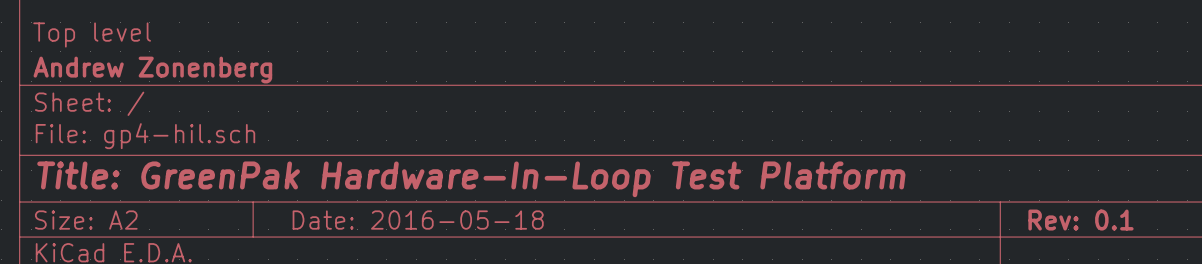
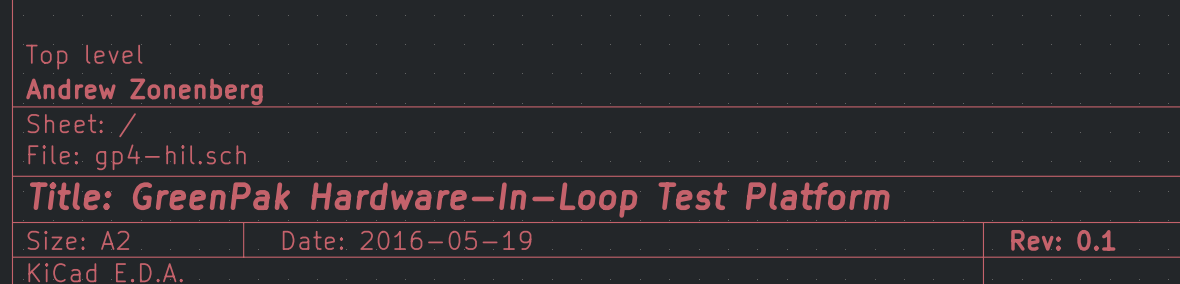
title block: Date: 2016-05-18 (418, 220) -> Date: 2016-05-19 (407, 240)

